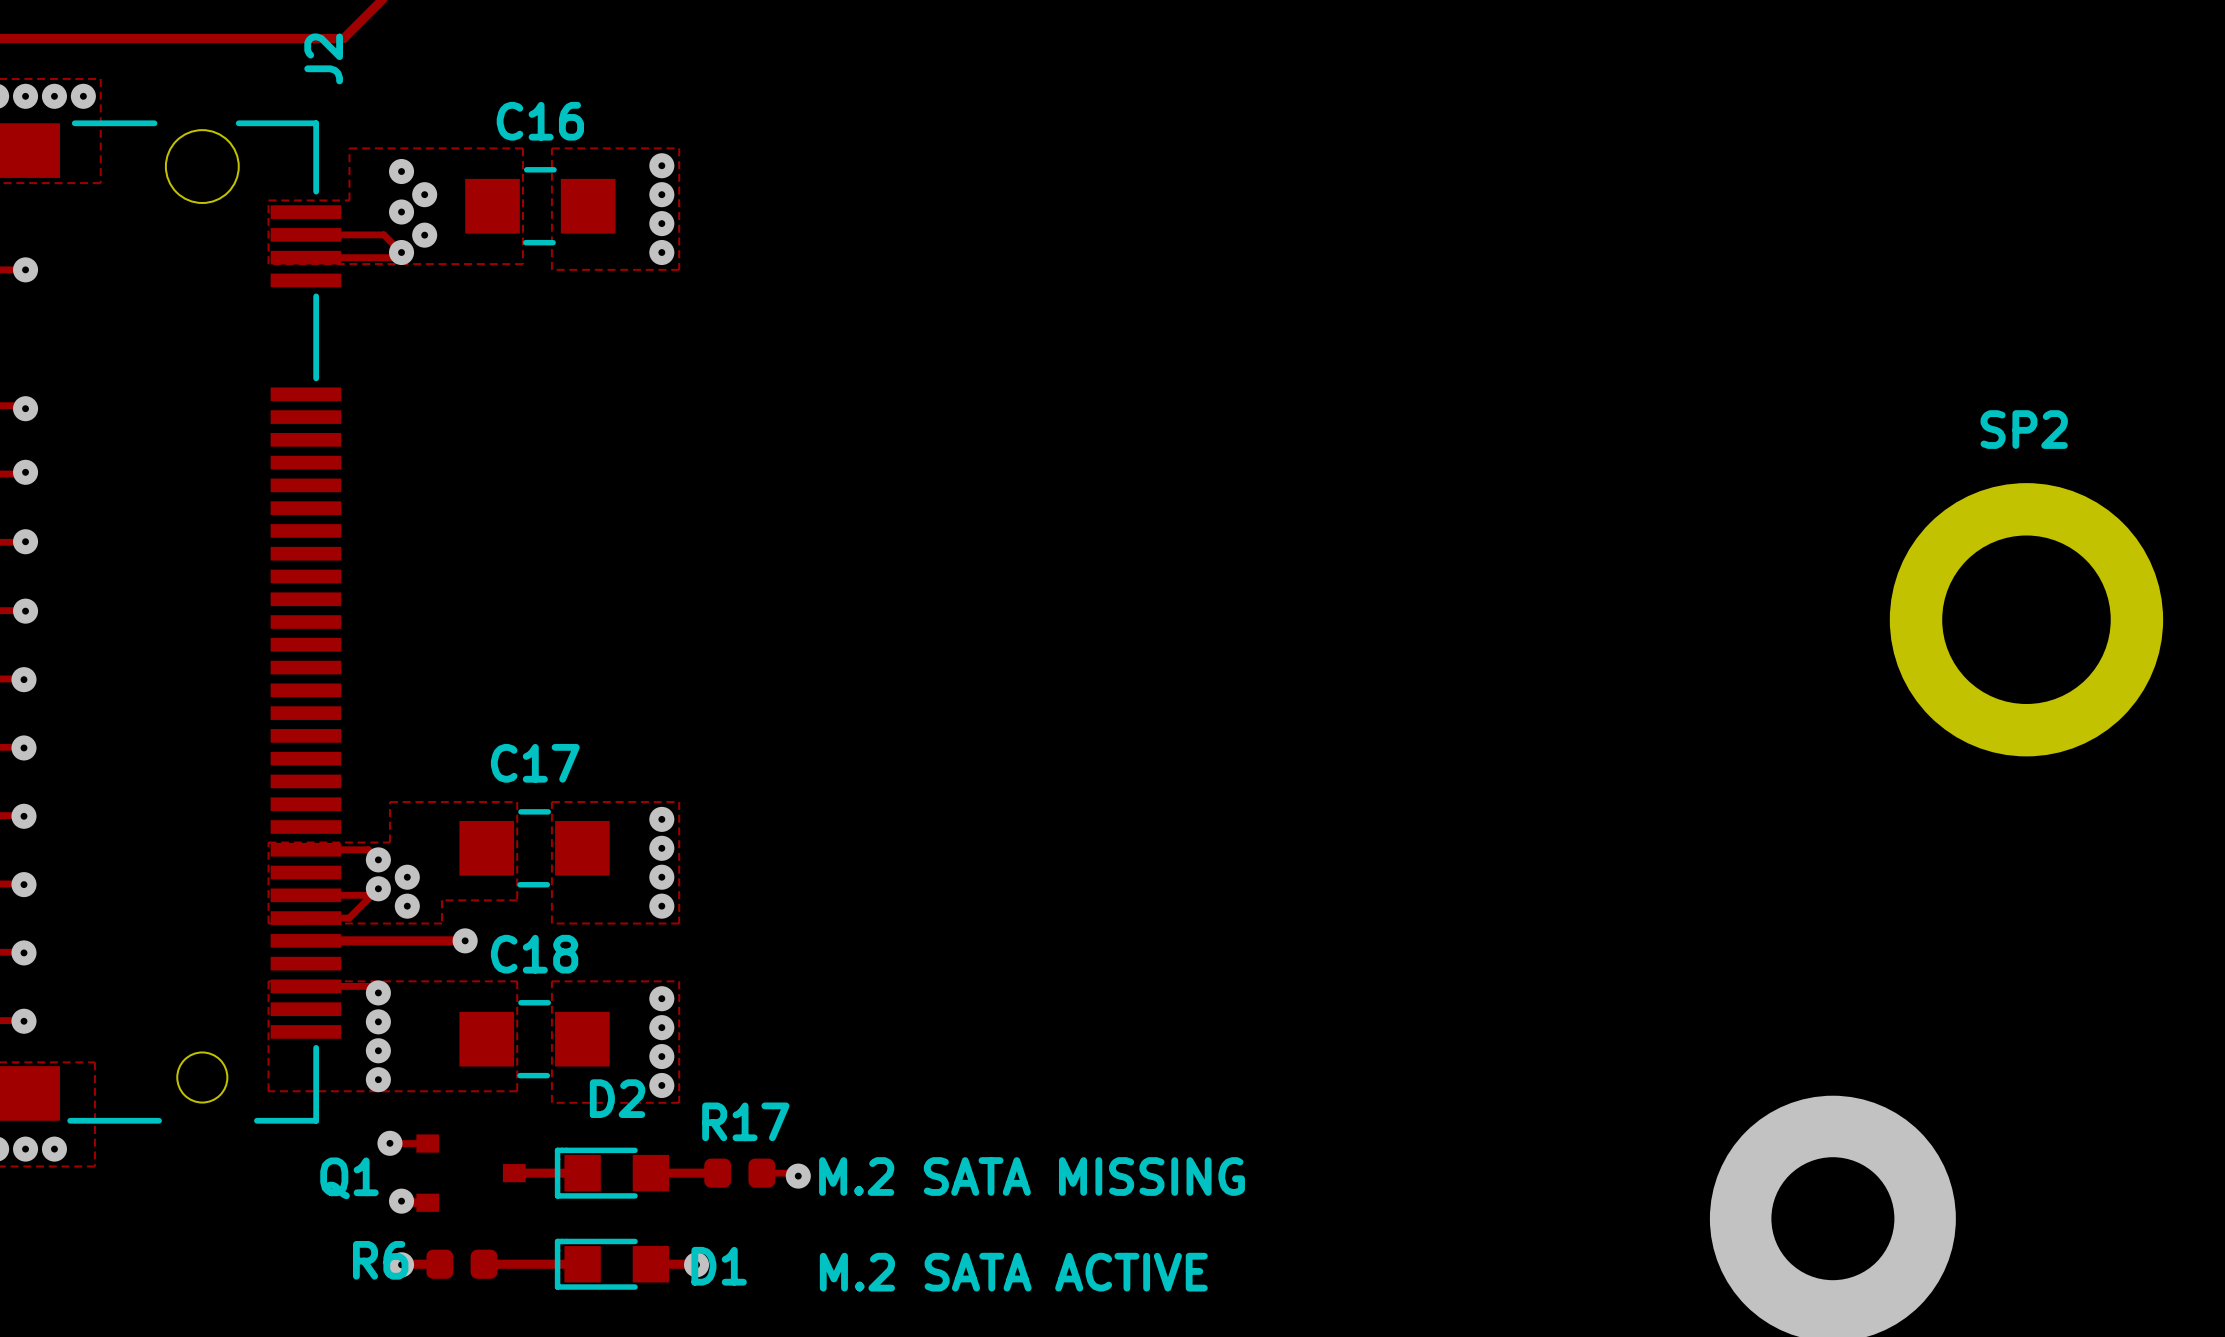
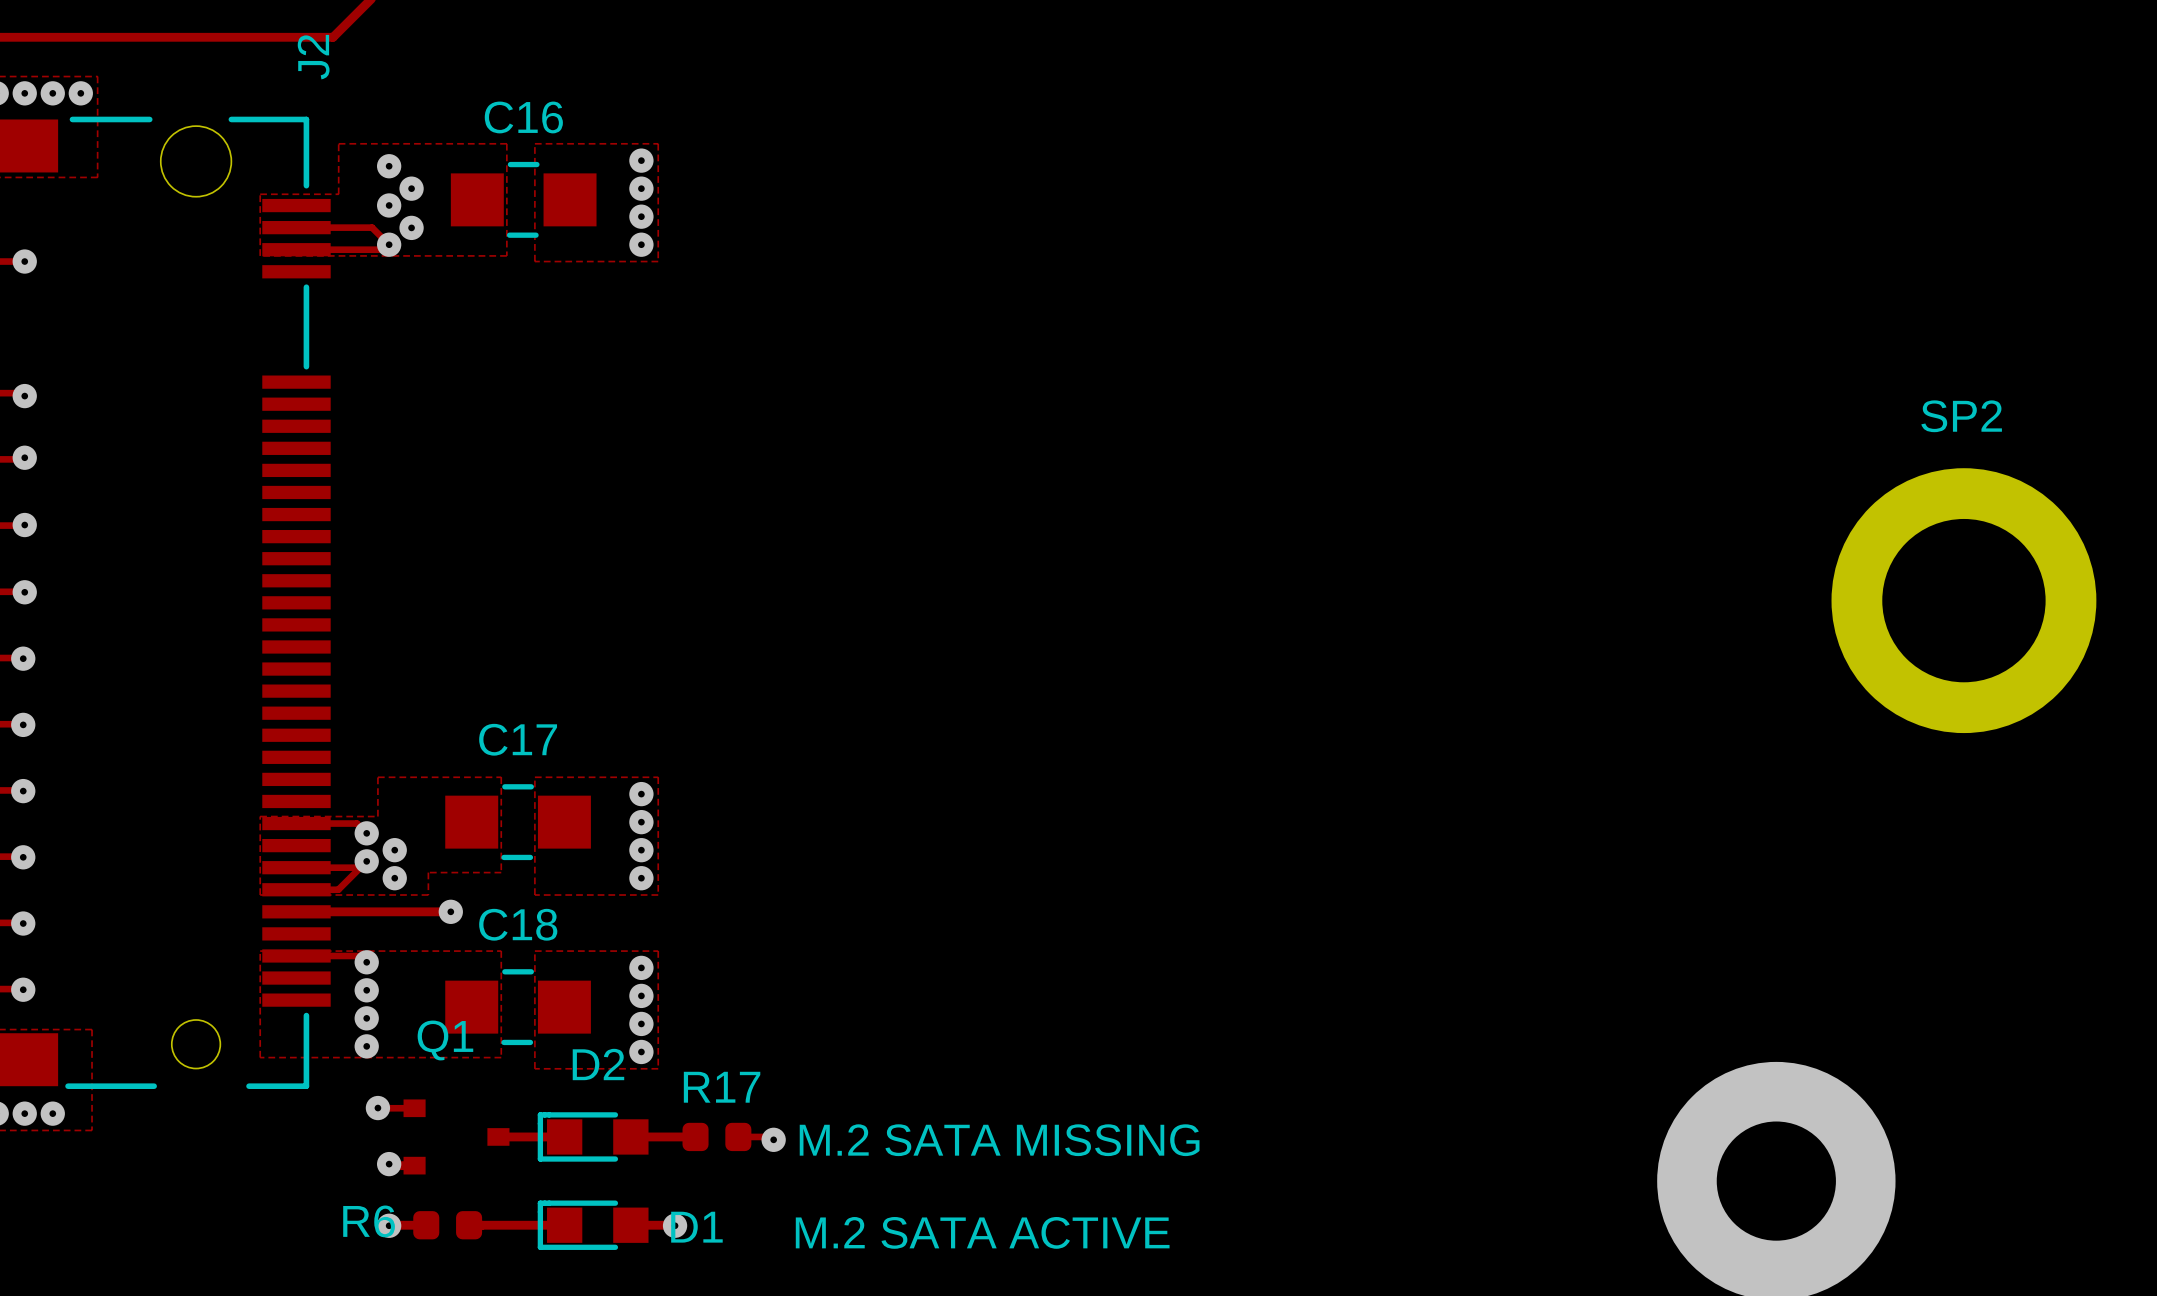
Q1 name position: Q1 (349, 1178) -> Q1 (445, 1040)

